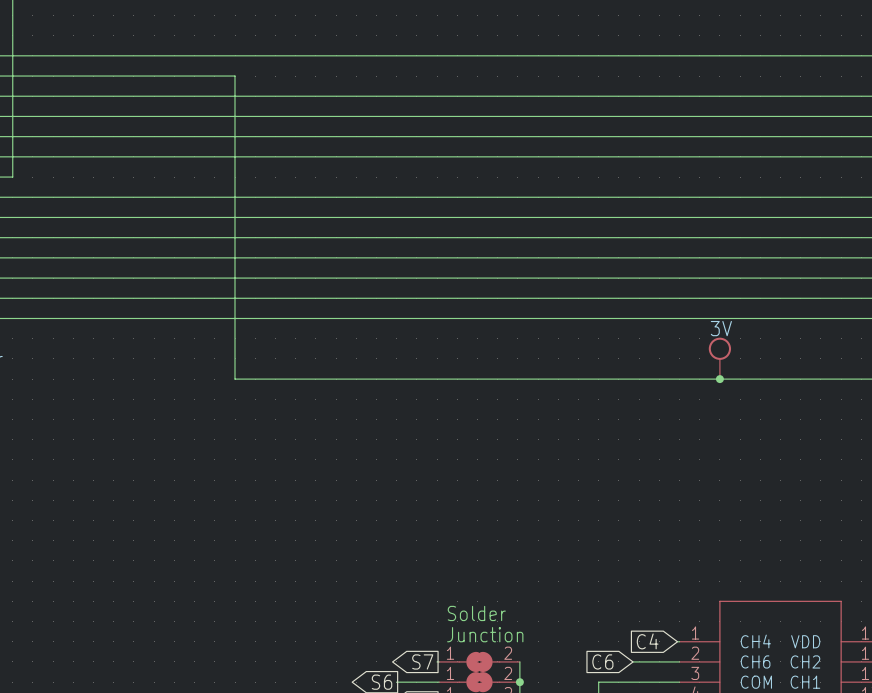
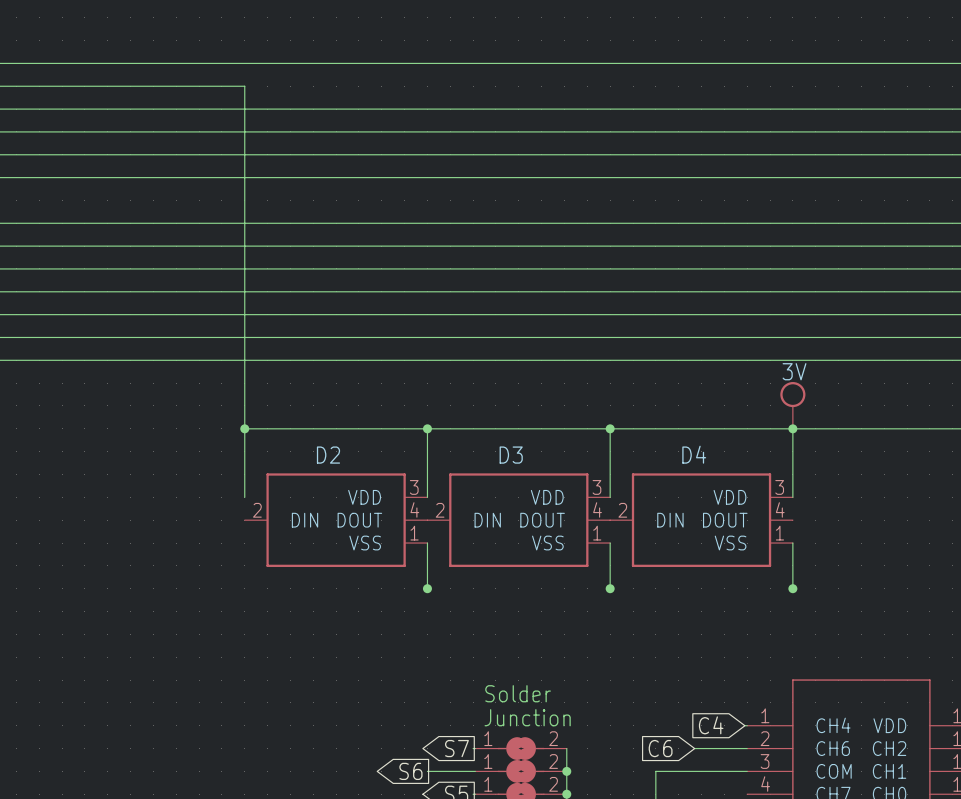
wire: none -> (244, 428) (244, 497)
junction: none -> (244, 428)
wire: none -> (427, 428) (427, 497)
junction: none -> (427, 428)
wire: none -> (610, 428) (610, 497)
junction: none -> (610, 428)
wire: none -> (792, 428) (792, 497)
D2: none -> (336, 520)
D3: none -> (518, 520)
D4: none -> (701, 520)
wire: none -> (427, 543) (427, 588)
wire: none -> (610, 543) (610, 588)
wire: none -> (792, 543) (792, 588)
junction: none -> (427, 588)
junction: none -> (610, 588)
junction: none -> (792, 588)

